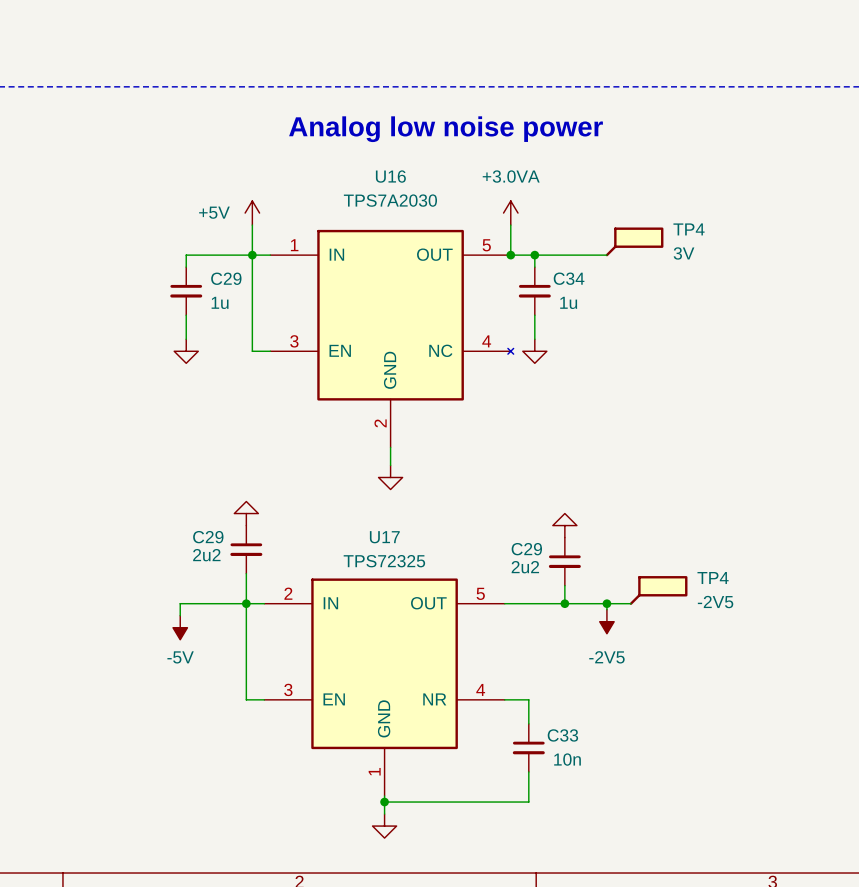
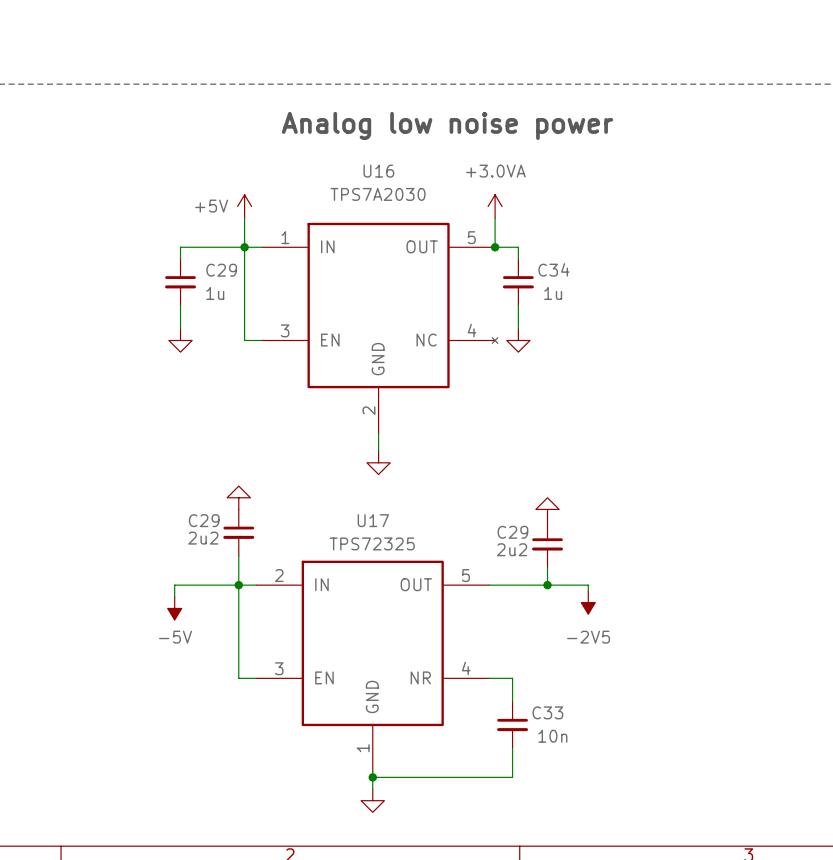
TP4: 3V (634, 241) -> none
wire: (534, 255) (606, 255) -> none
junction: (534, 255) -> none
TP4: -2V5 (658, 590) -> none
wire: (606, 603) (630, 603) -> none
junction: (606, 603) -> none

